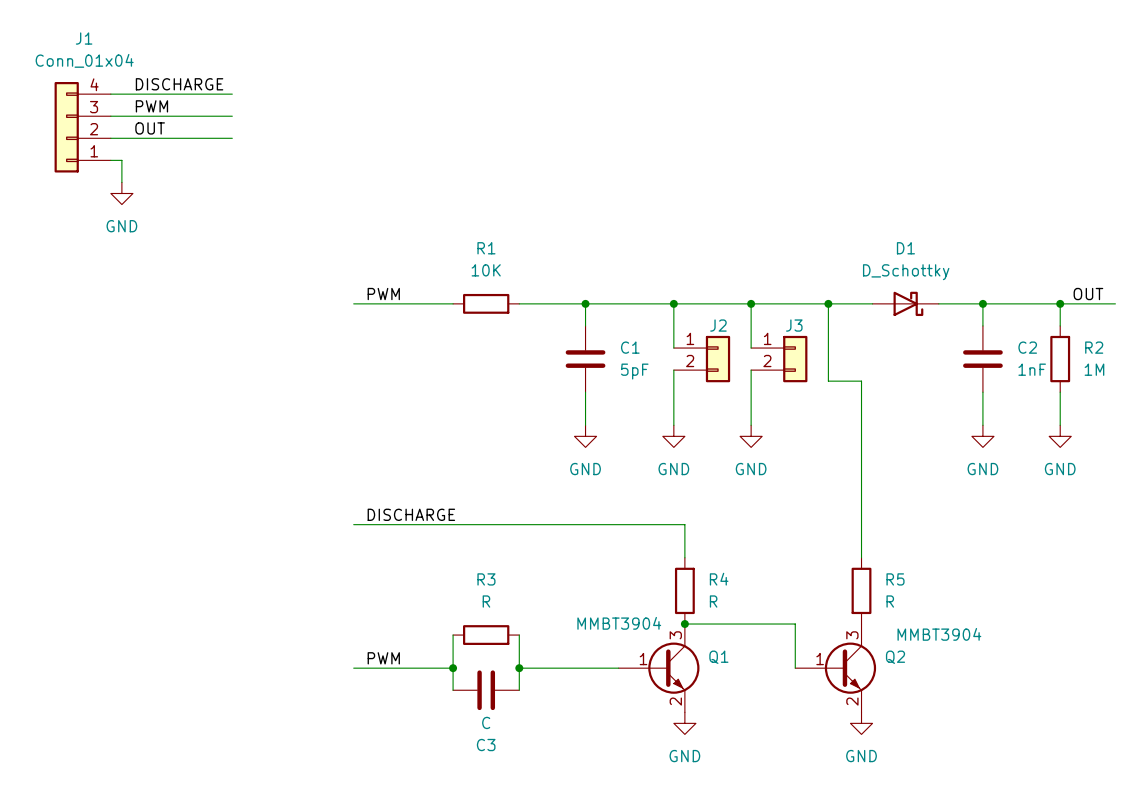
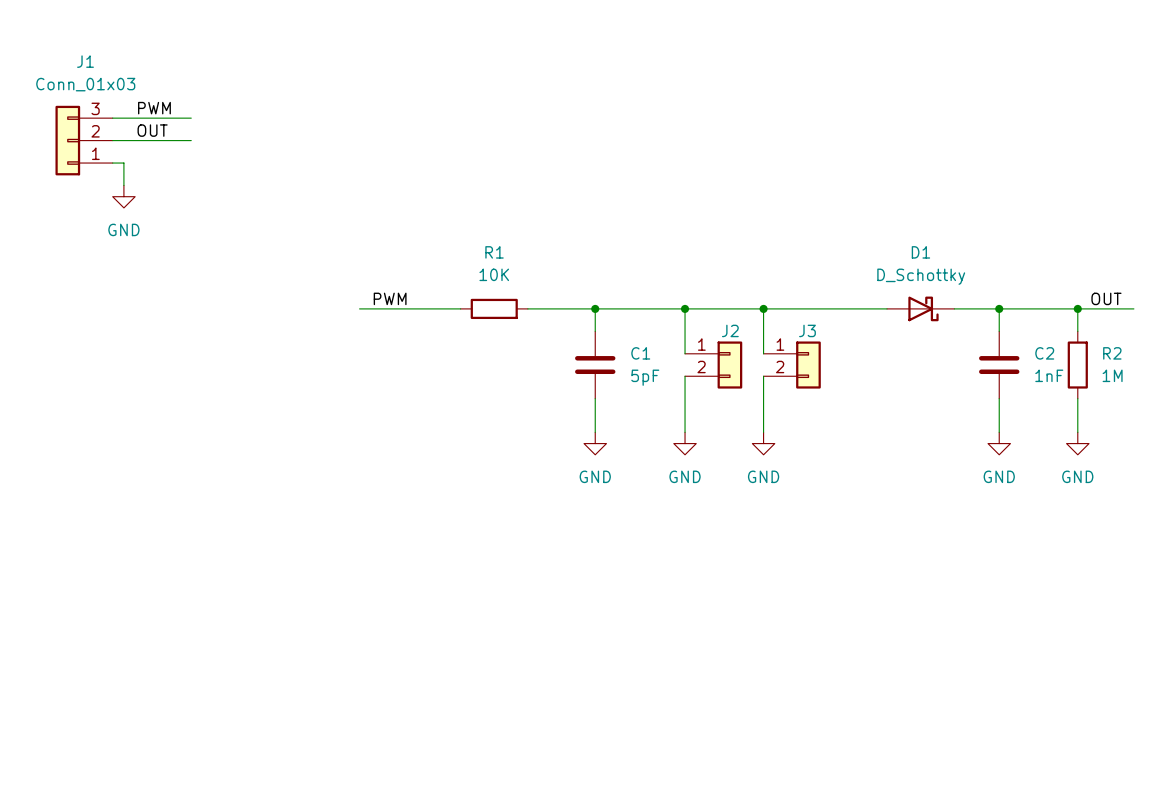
J1 value: Conn_01x04 (84, 60) -> Conn_01x03 (85, 84)
J1 symbol: [54, 81, 111, 173] -> [55, 105, 113, 176]
label: DISCHARGE (179, 84) -> none
wire: (110, 94) (232, 94) -> none
wire: (188, 116) (232, 116) -> none
wire: (188, 138) (232, 138) -> none
wire: (828, 303) (828, 381) (861, 381) (861, 557) -> none
junction: (828, 303) -> none
label: DISCHARGE (411, 514) -> none
wire: (353, 524) (684, 524) (684, 557) -> none
R4: R (684, 590) -> none
R5: R (861, 590) -> none
wire: (684, 624) (795, 624) (795, 668) -> none
junction: (684, 624) -> none
wire: (453, 635) (453, 690) -> none
R3: R (486, 635) -> none
wire: (519, 635) (519, 690) -> none
label: PWM (383, 658) -> none
wire: (353, 668) (453, 668) -> none
junction: (453, 668) -> none
wire: (519, 668) (618, 668) -> none
junction: (519, 668) -> none
Q1: MMBT3904 (659, 668) -> none
Q2: MMBT3904 (835, 668) -> none
C3: C (486, 690) -> none
power symbol: GND (684, 723) -> none
power symbol: GND (861, 723) -> none

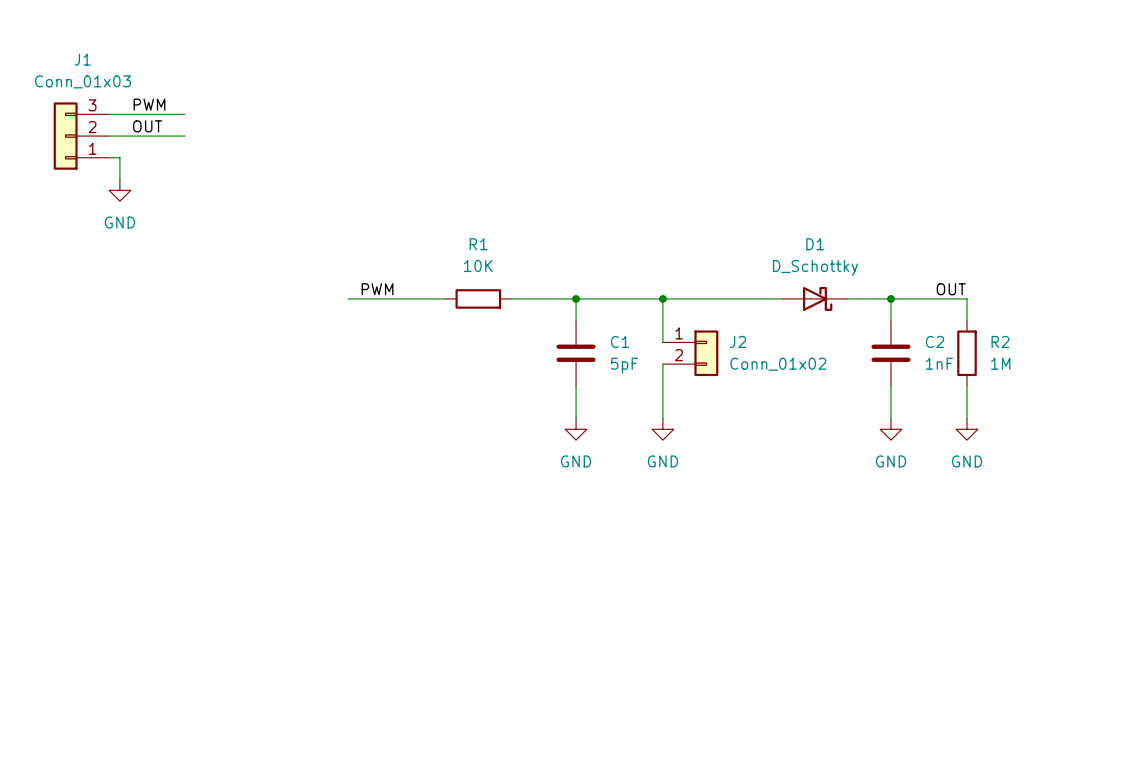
label position: OUT (1106, 298) -> OUT (951, 289)
wire: (763, 308) (763, 353) -> none
junction: (763, 308) -> none
junction: none -> (890, 298)
D1 position: (920, 308) -> (814, 298)
wire: (999, 308) (1133, 308) -> none
junction: (999, 308) -> none
wire: (1077, 308) (1077, 331) -> (890, 298) (890, 320)
junction: (1077, 308) -> none
J2 name position: J2 (730, 330) -> J2 (737, 341)
J3: (792, 365) -> none
C2 position: (999, 365) -> (890, 353)
R2 position: (1077, 365) -> (967, 353)
wire: (763, 376) (763, 432) -> none
J2 value: none -> Conn_01x02 (778, 364)
wire: (1077, 398) (1077, 432) -> (890, 385) (890, 418)
power symbol: GND (763, 443) -> none
power symbol: none -> GND (890, 429)
power symbol: GND (1077, 443) -> none

